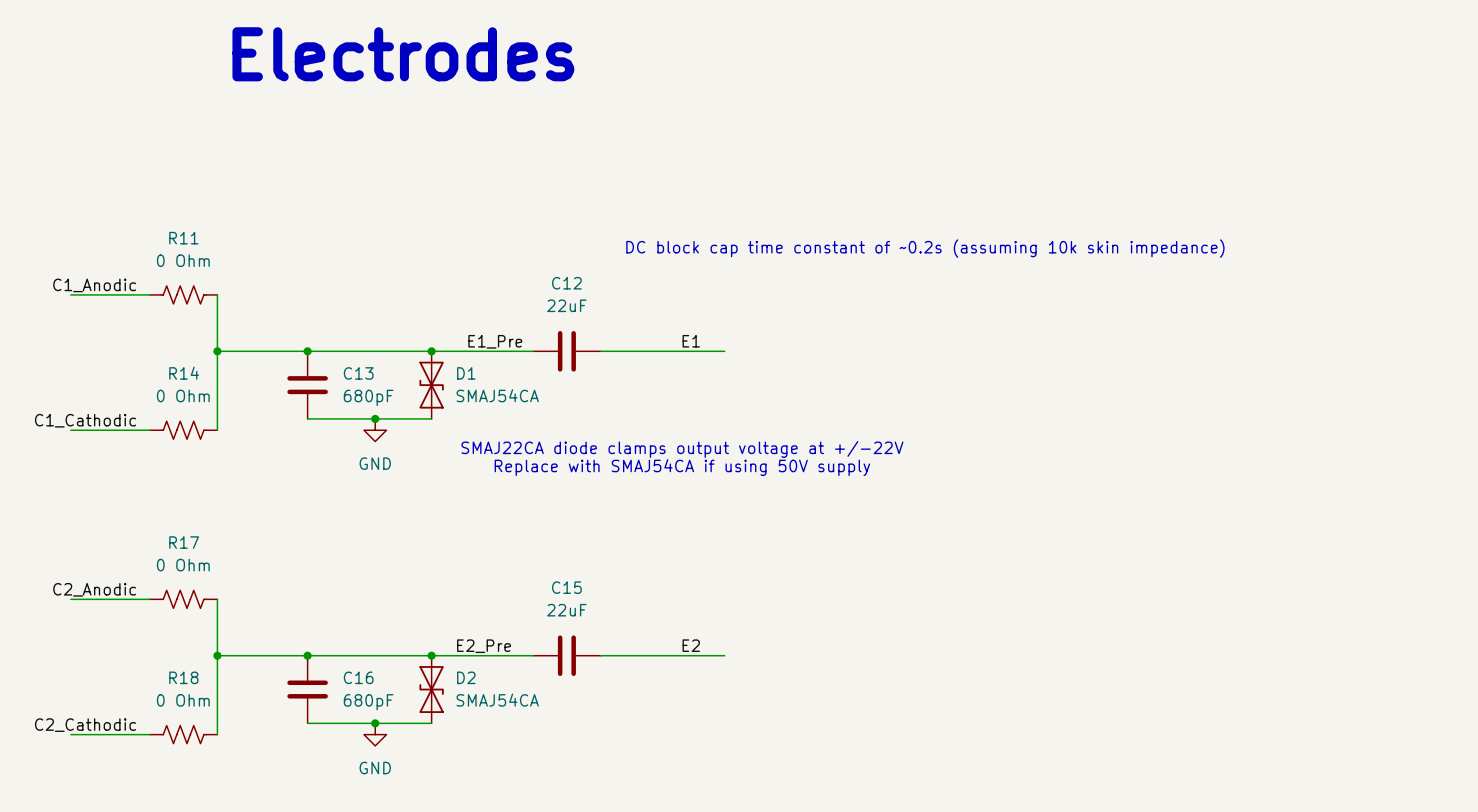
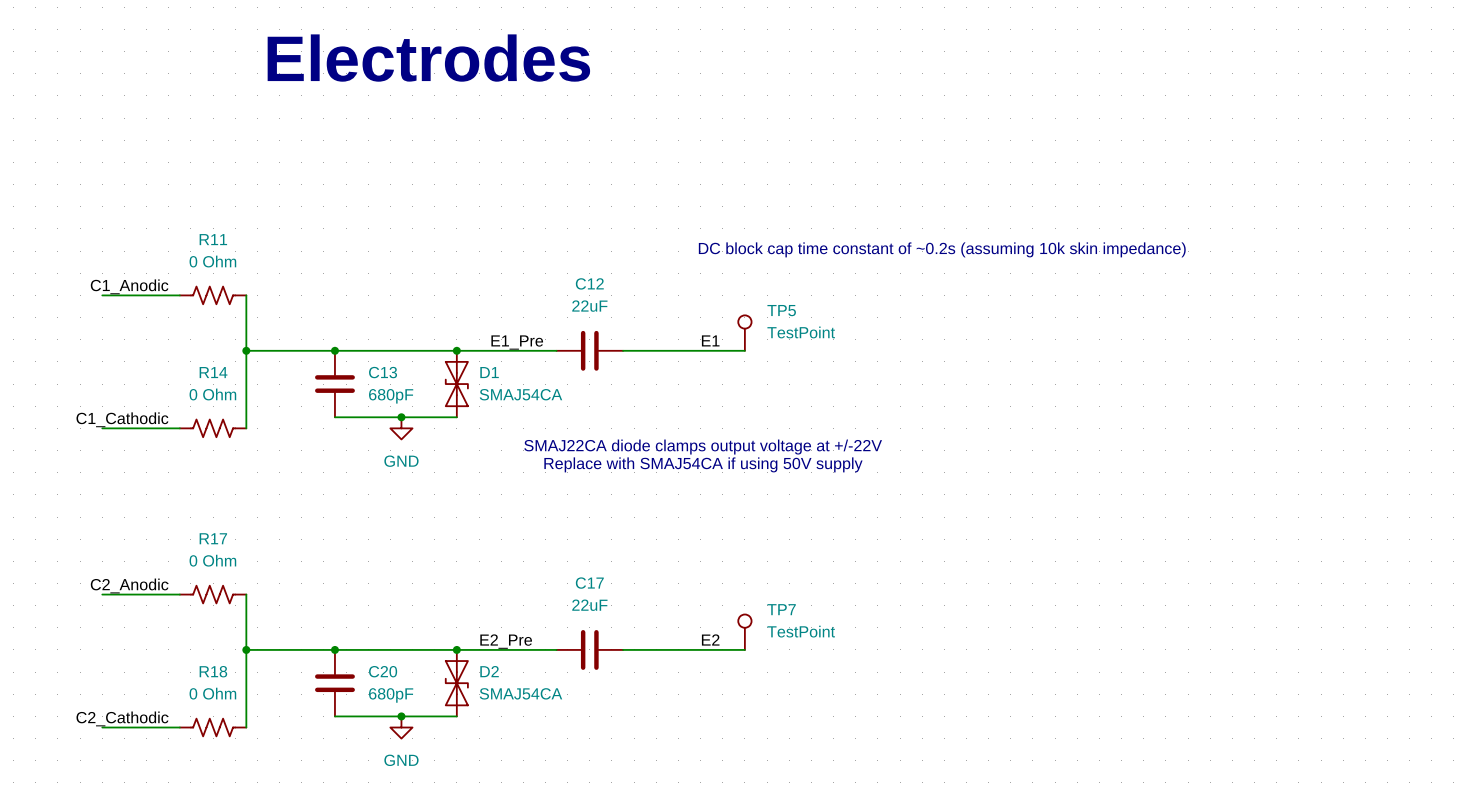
TP5: none -> TestPoint (744, 333)
C15 name: C15 (566, 587) -> C17 (589, 583)
TP7: none -> TestPoint (744, 632)
C16 name: C16 (358, 677) -> C20 (383, 671)

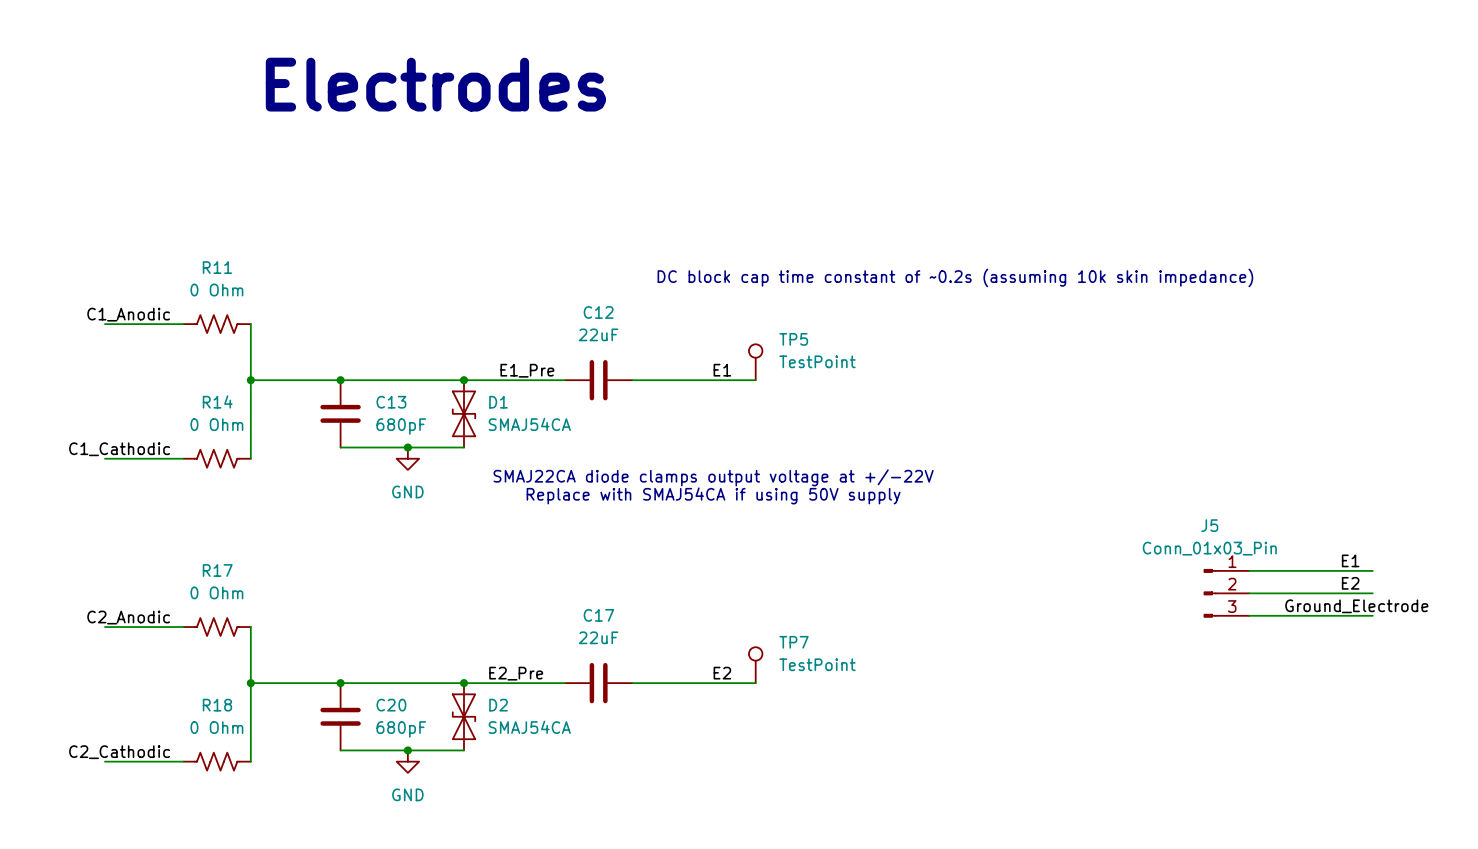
label: none -> E1 (1350, 560)
wire: none -> (1249, 570) (1372, 570)
label: none -> E2 (1350, 583)
J5: none -> Conn_01x03_Pin (1226, 593)
wire: none -> (1249, 593) (1372, 593)
label: none -> Ground_Electrode (1356, 606)
wire: none -> (1249, 615) (1372, 615)

